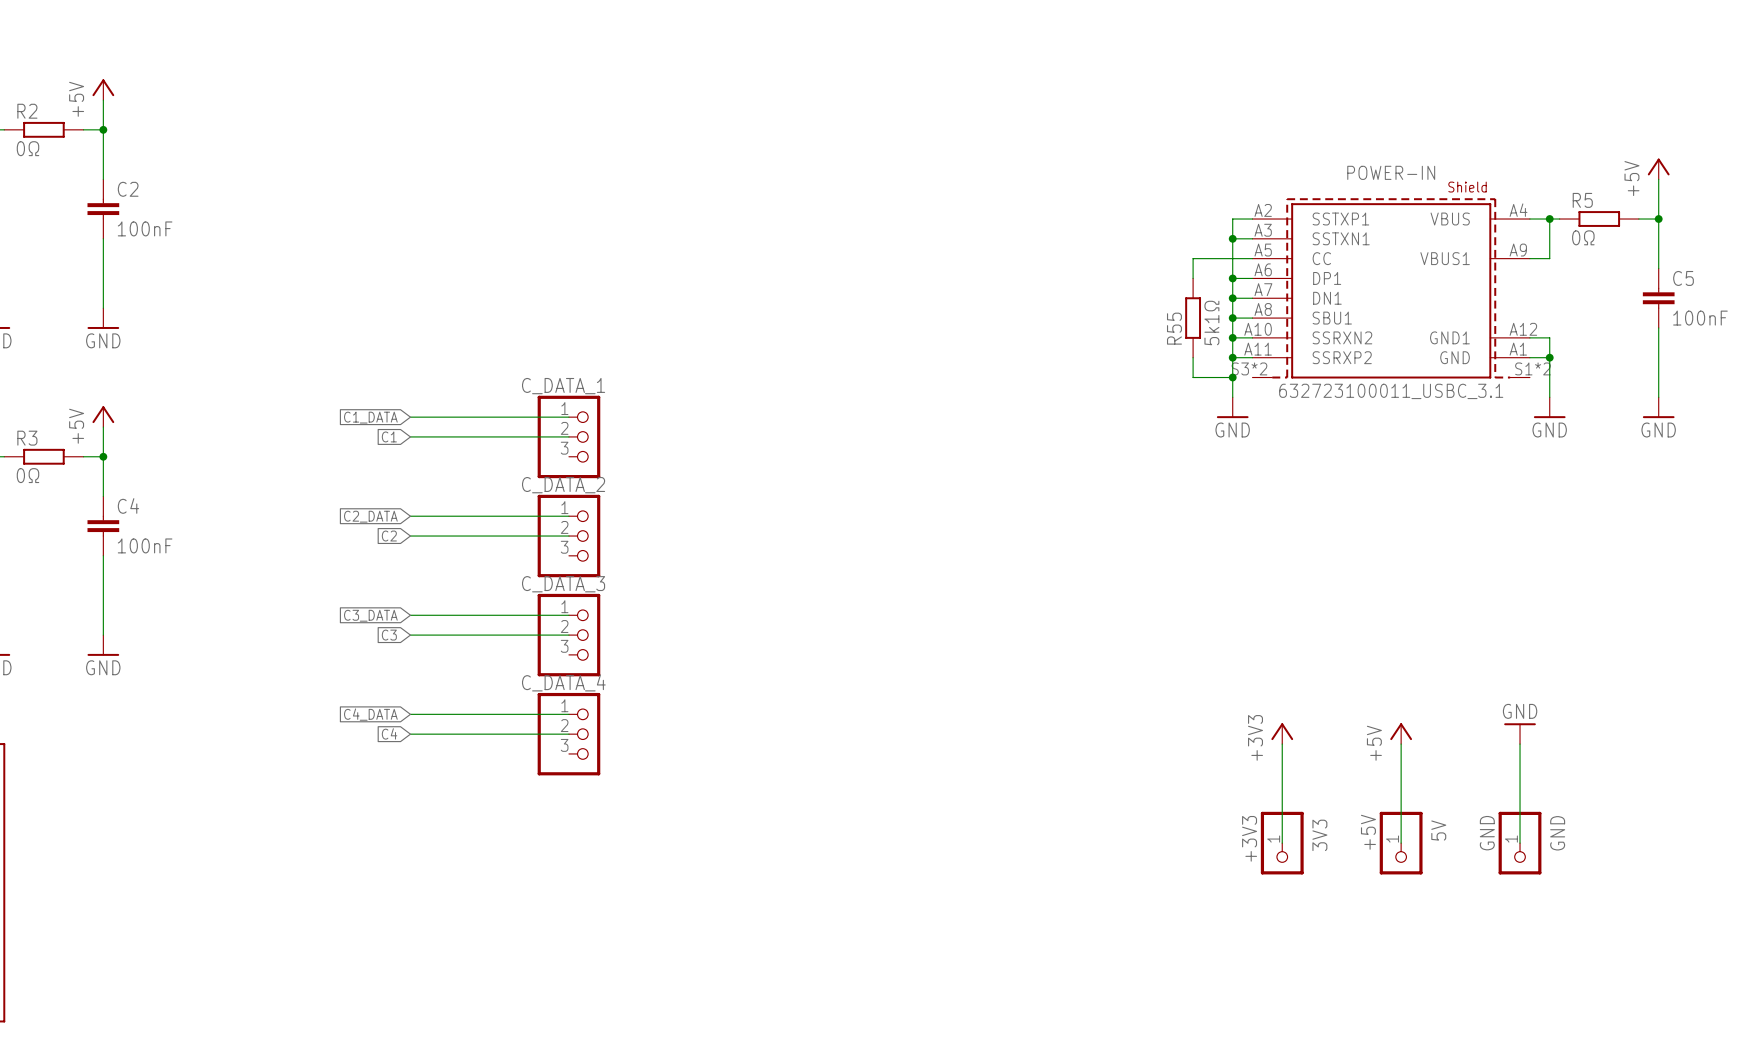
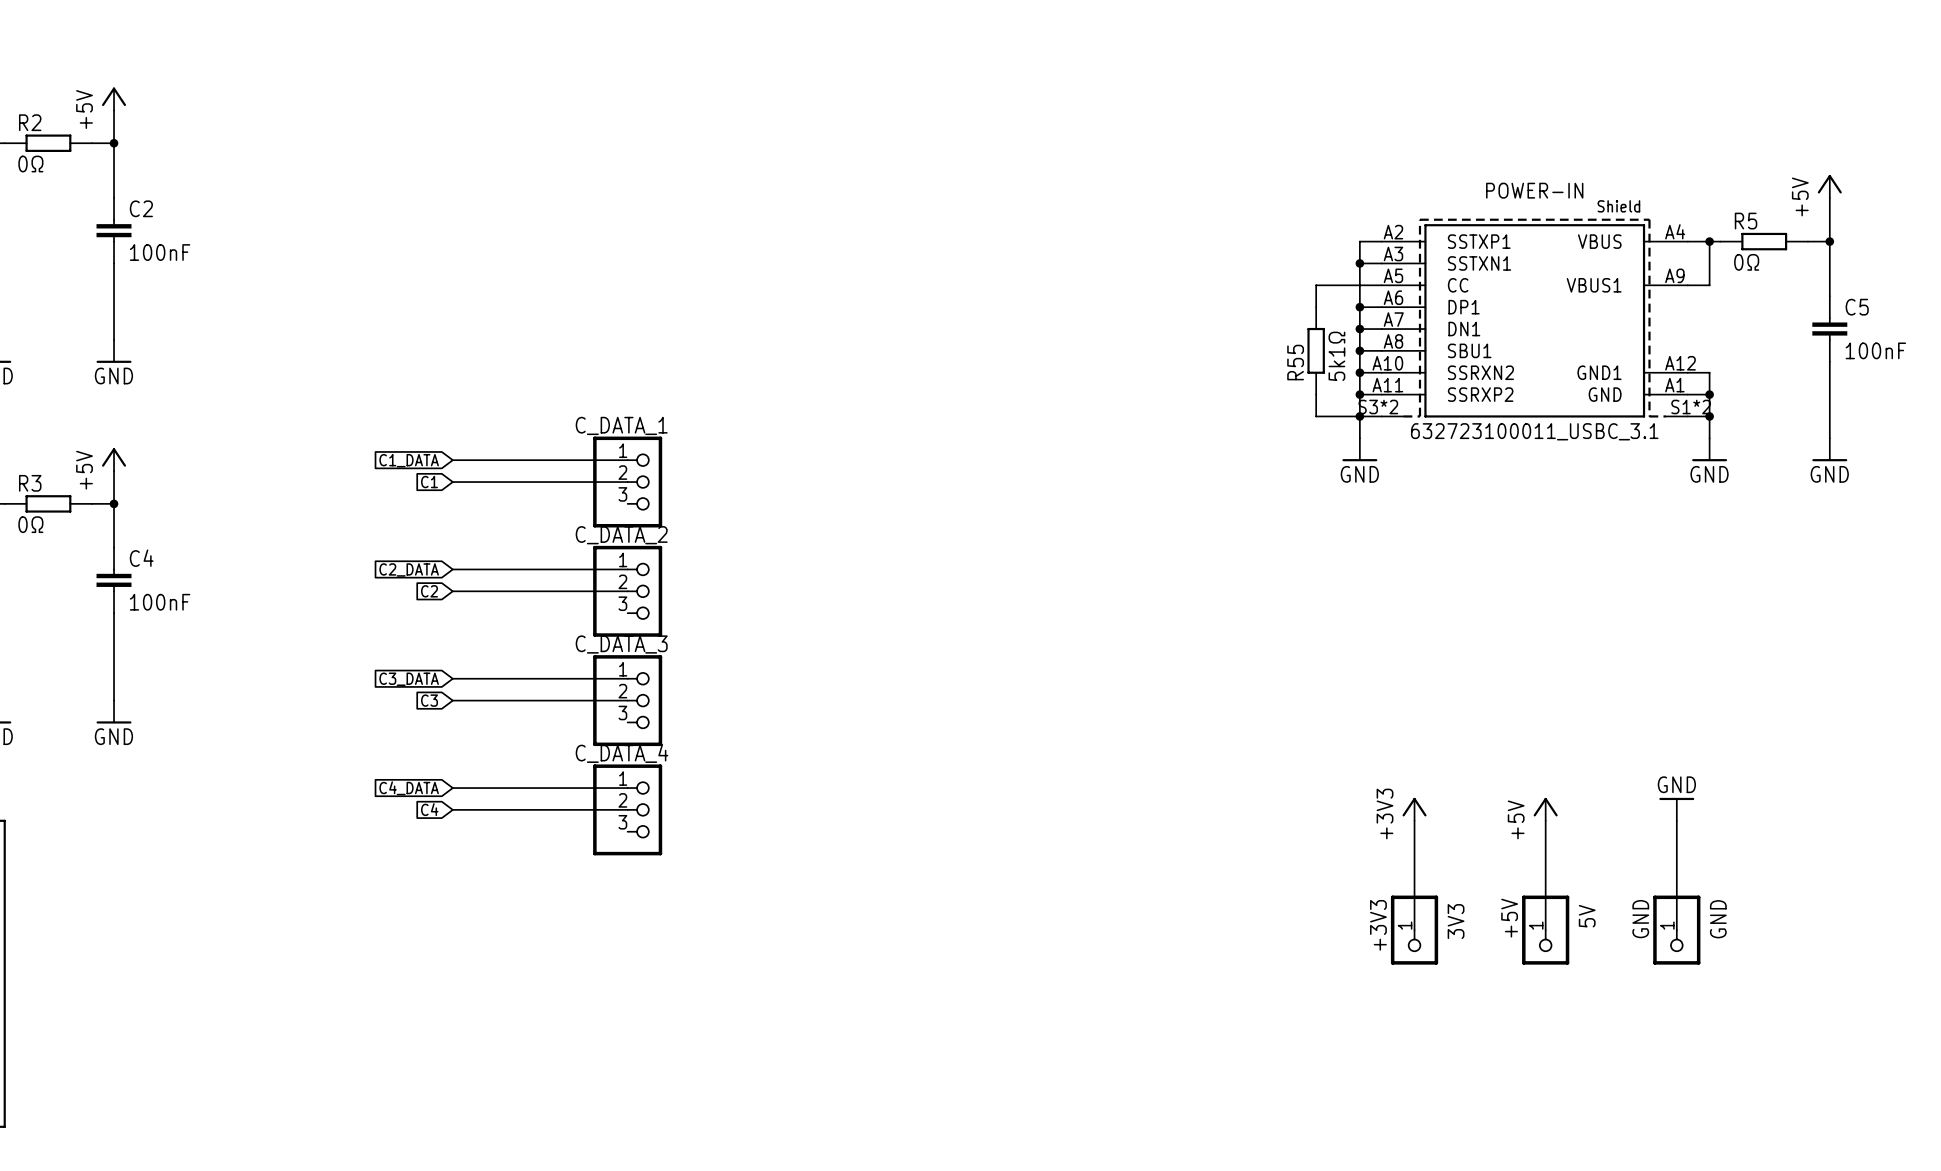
wire: none -> (1359, 416) (1381, 416)
wire: none -> (1687, 416) (1709, 416)
junction: none -> (1709, 416)

